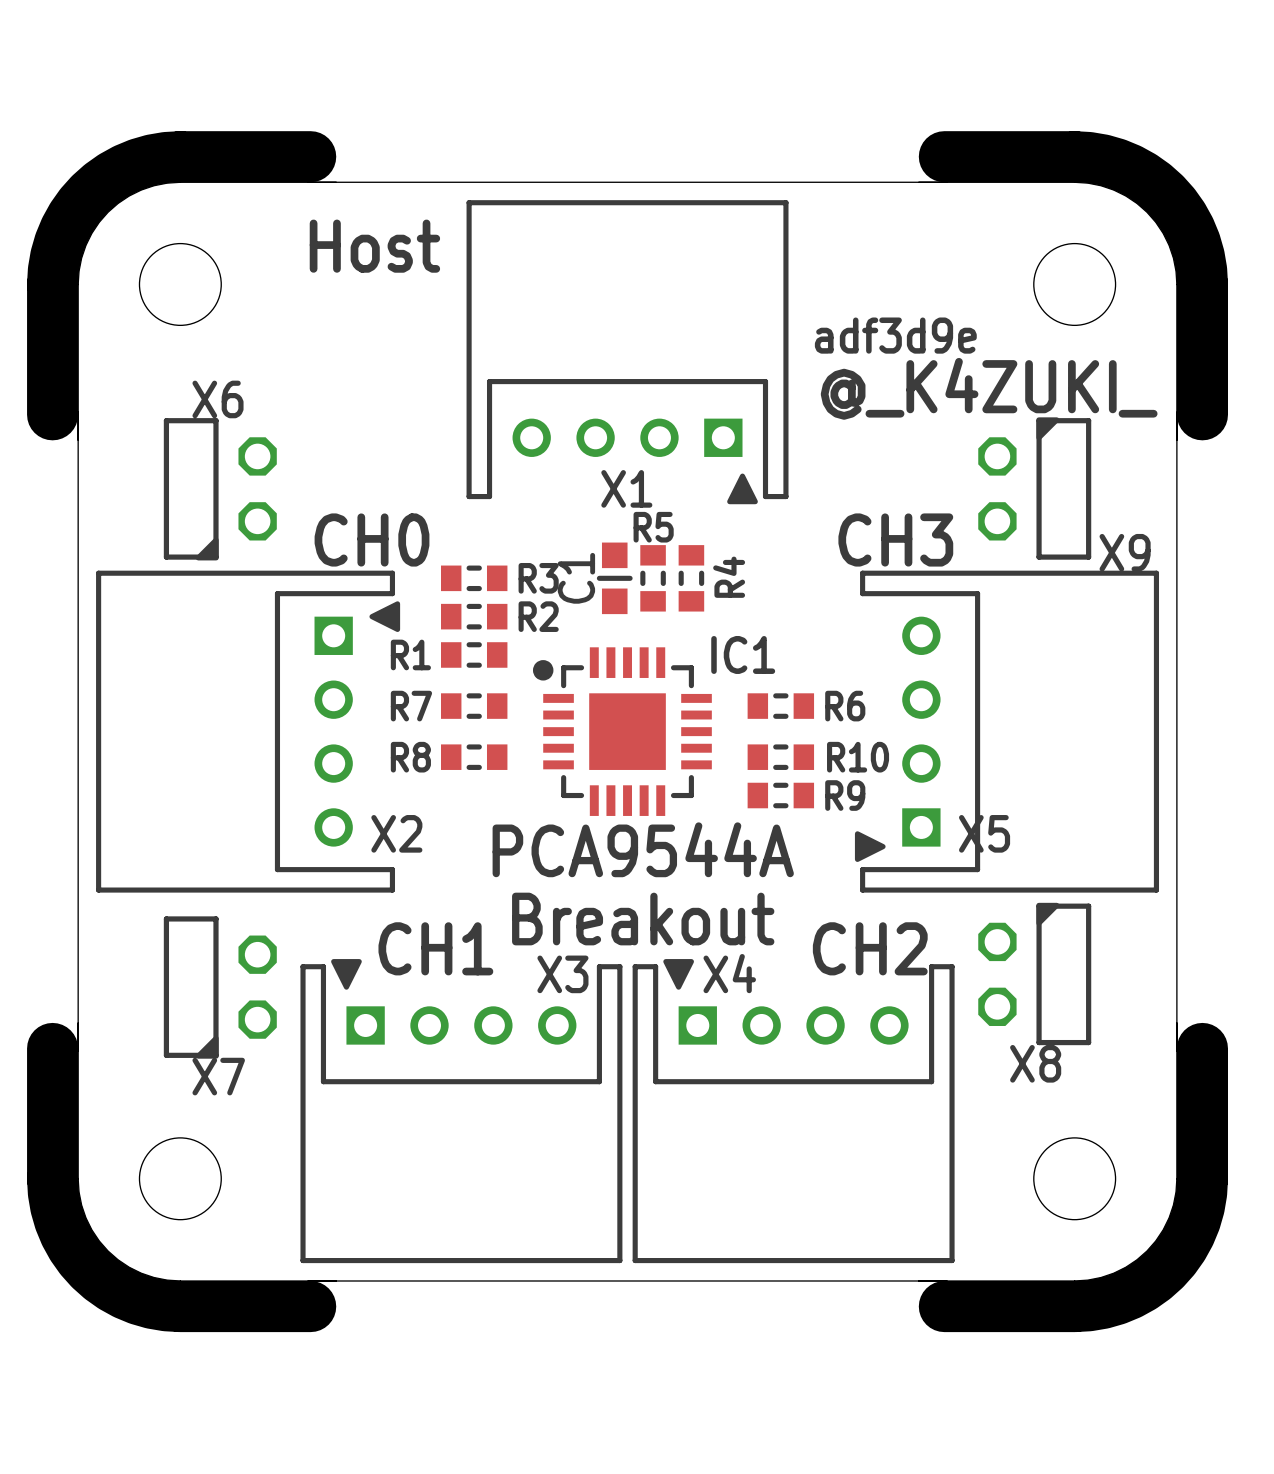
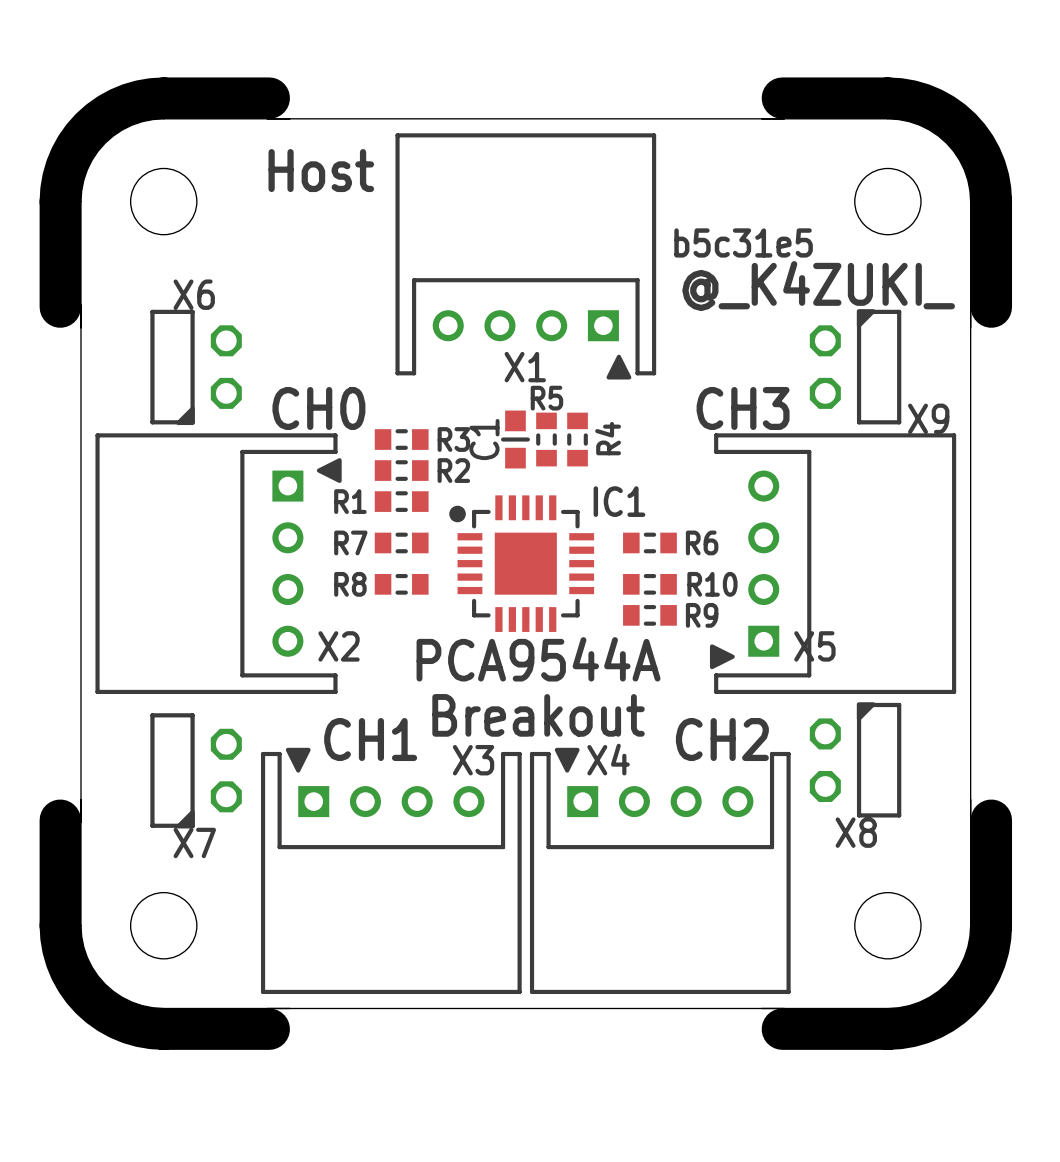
drawing shape: [814, 317, 977, 354] -> [674, 228, 813, 258]

